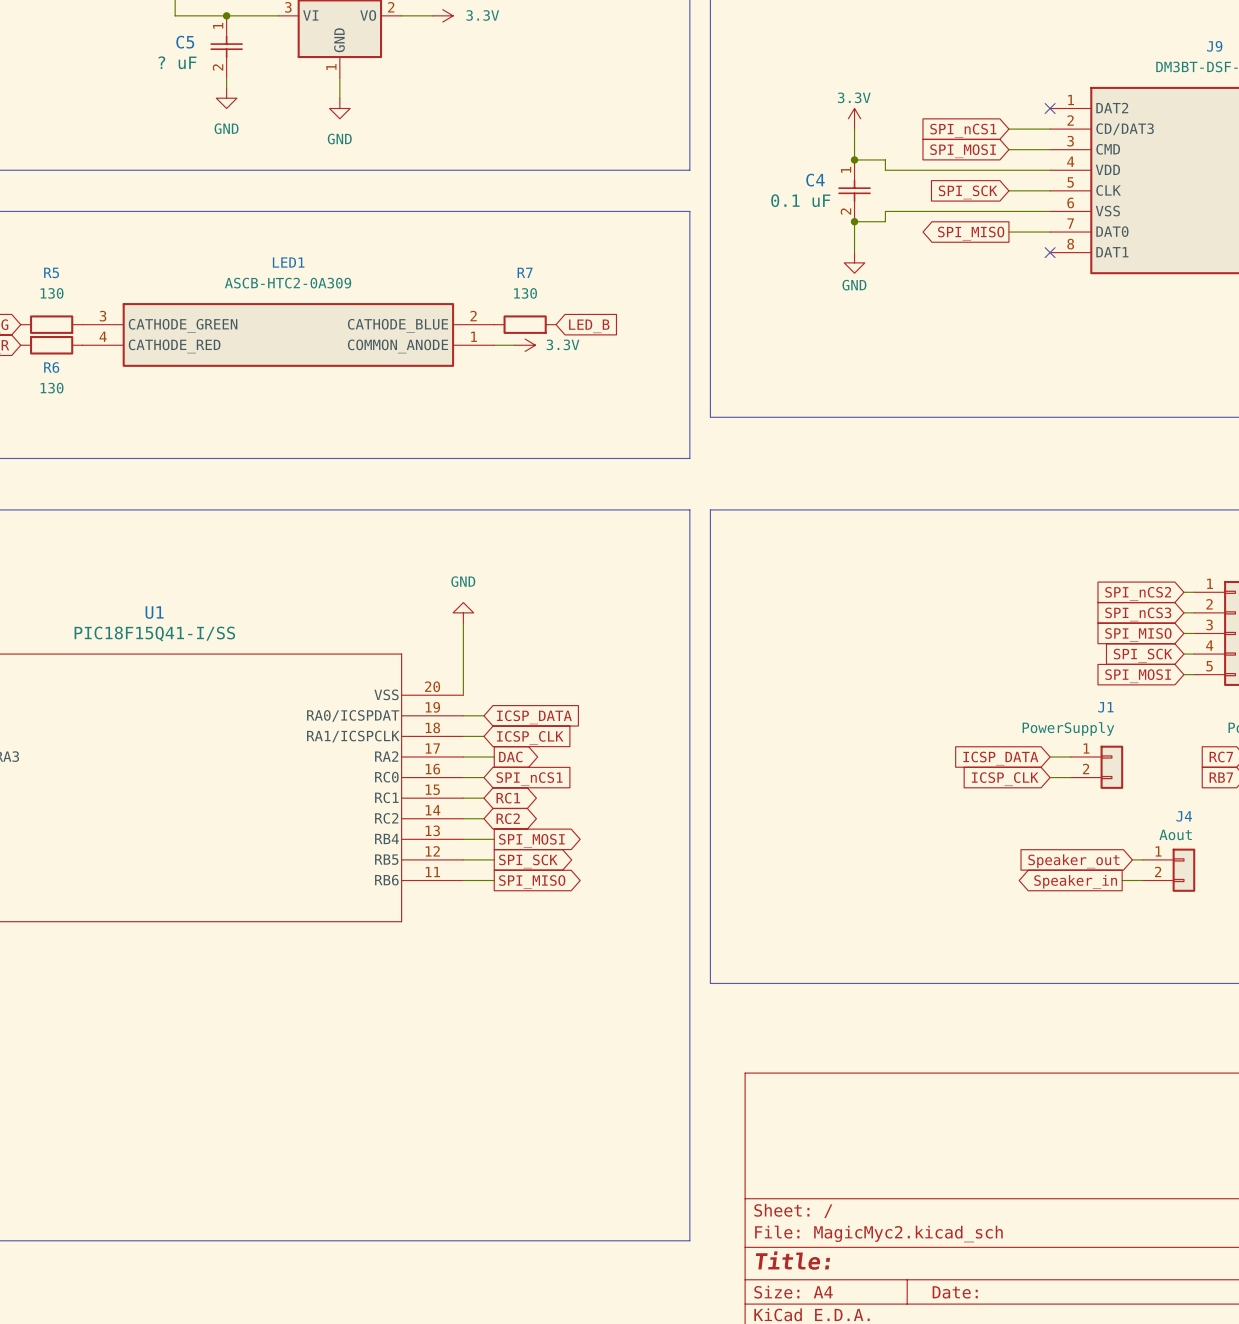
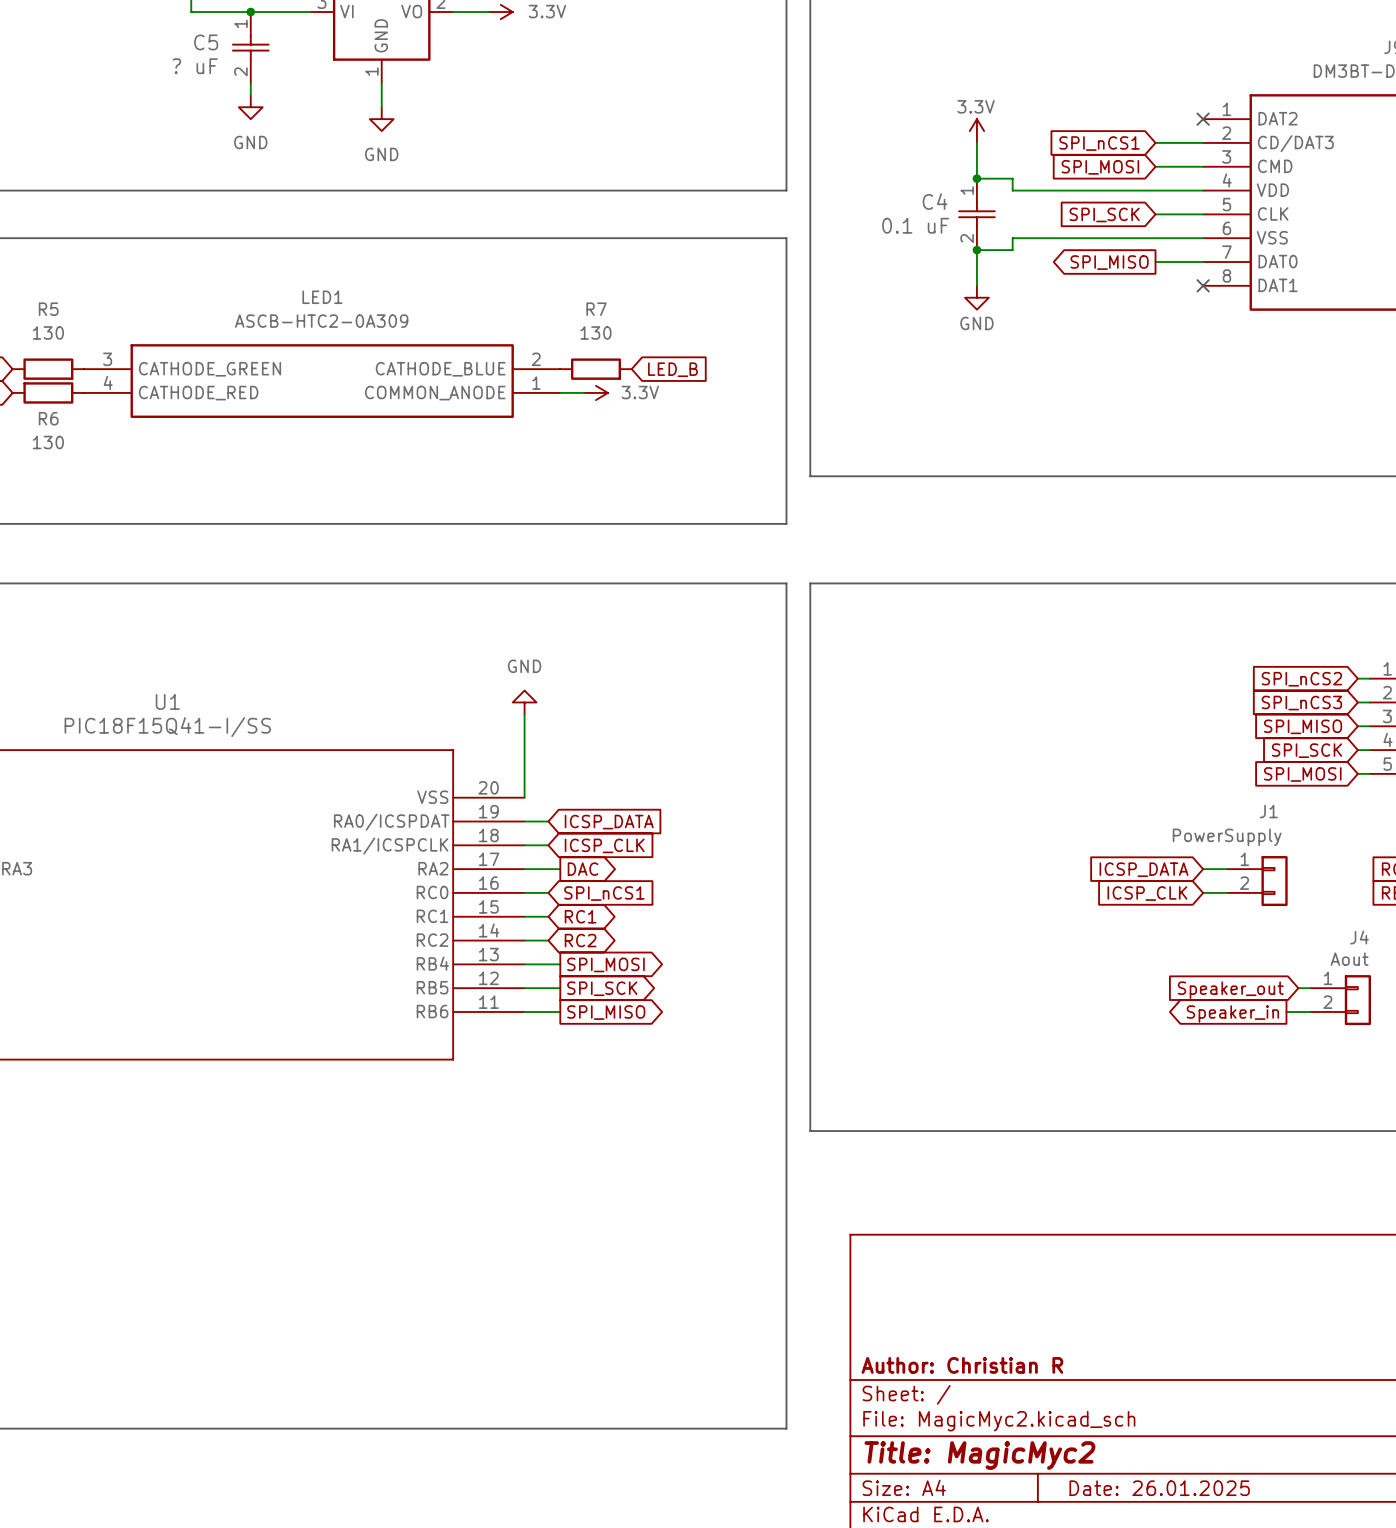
title block: none -> Author: Christian R (962, 1365)
title block: Title: (792, 1260) -> Title: MagicMyc2 (979, 1455)
title block: Date: (955, 1292) -> Date: 26.01.2025 (1159, 1488)

